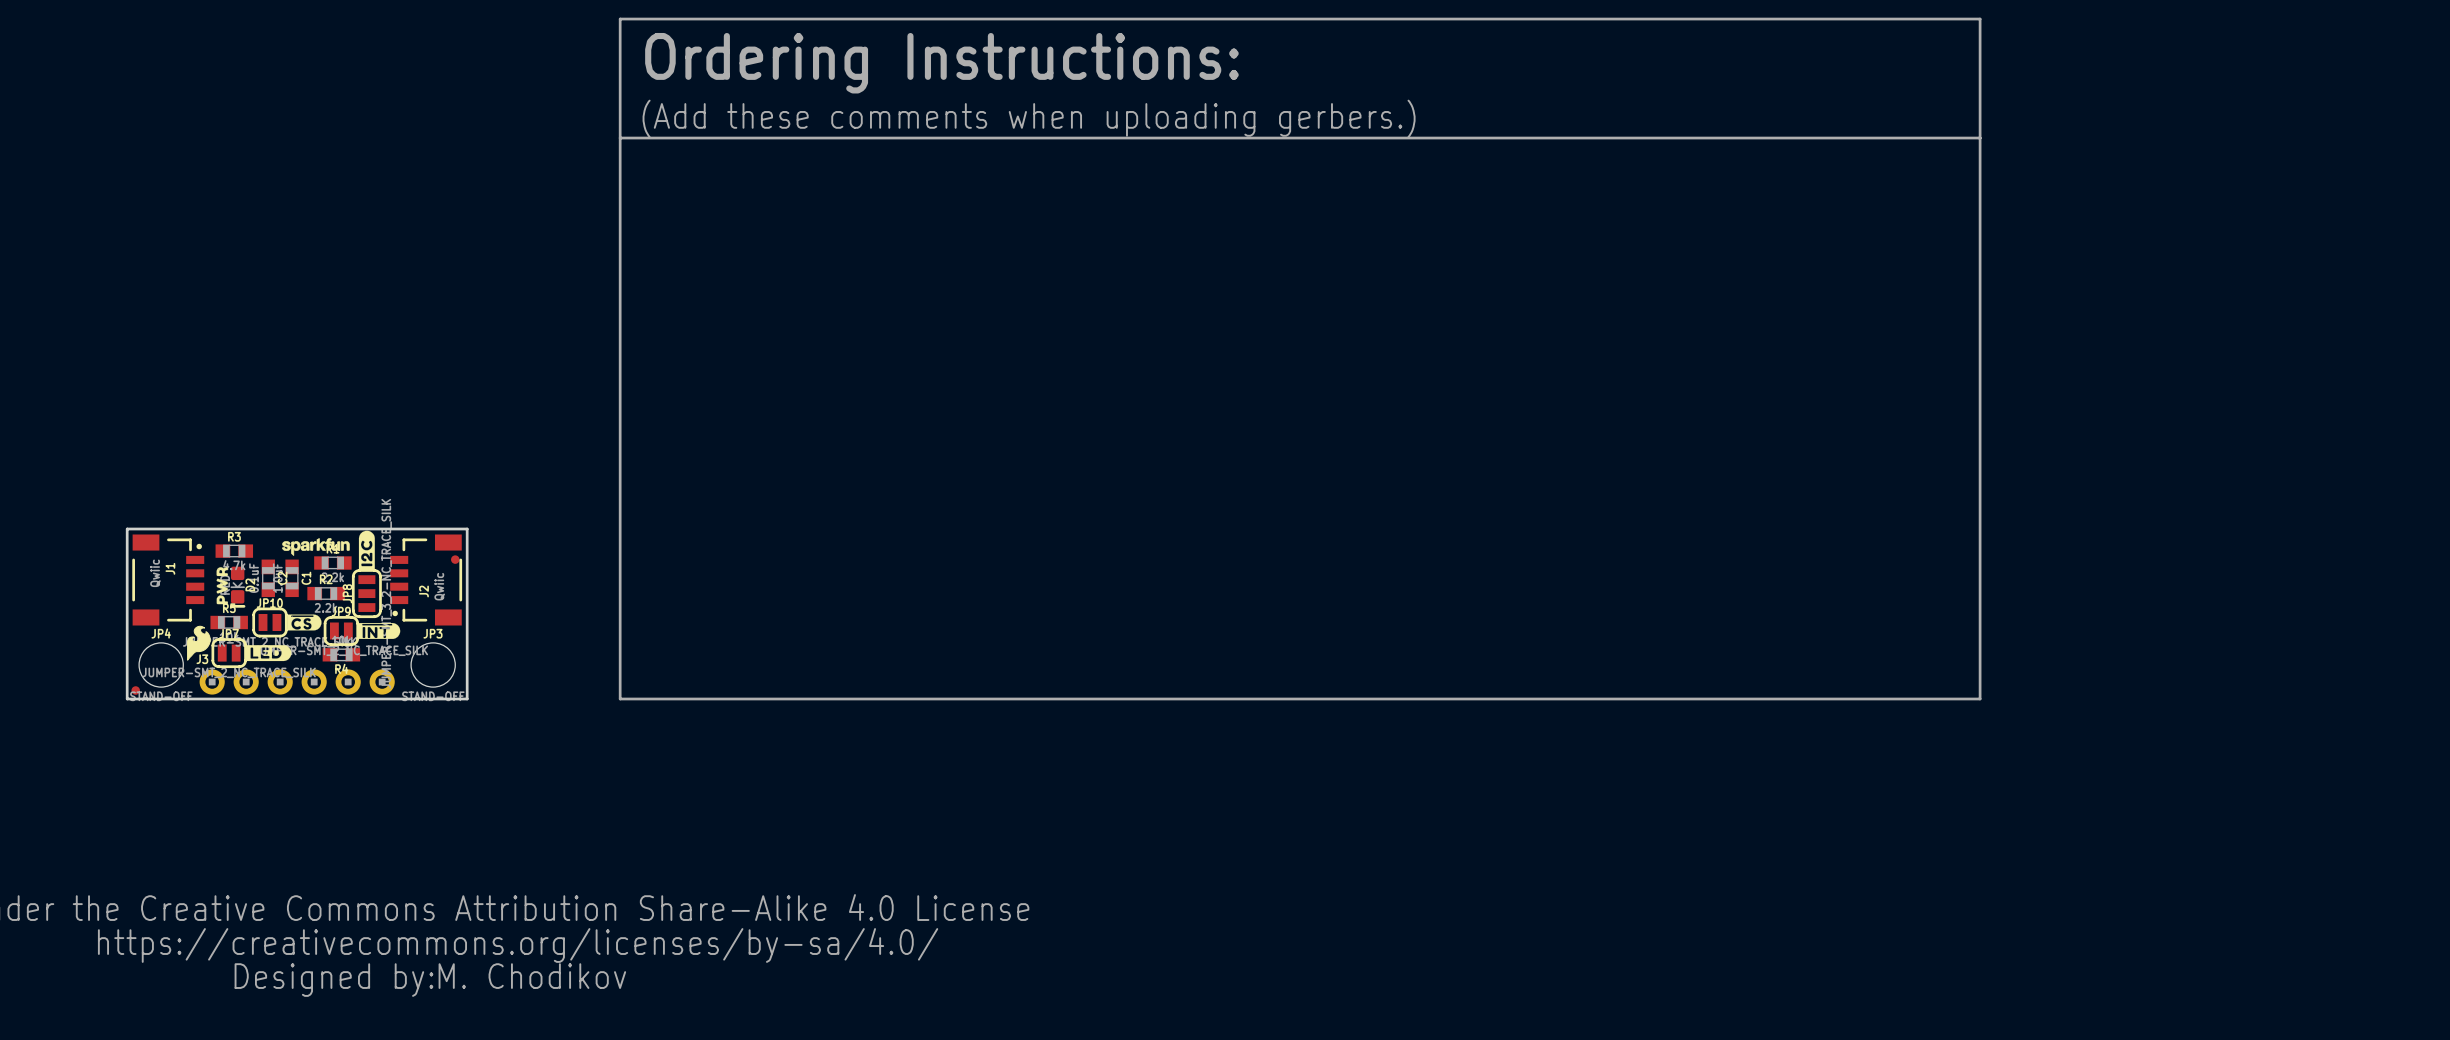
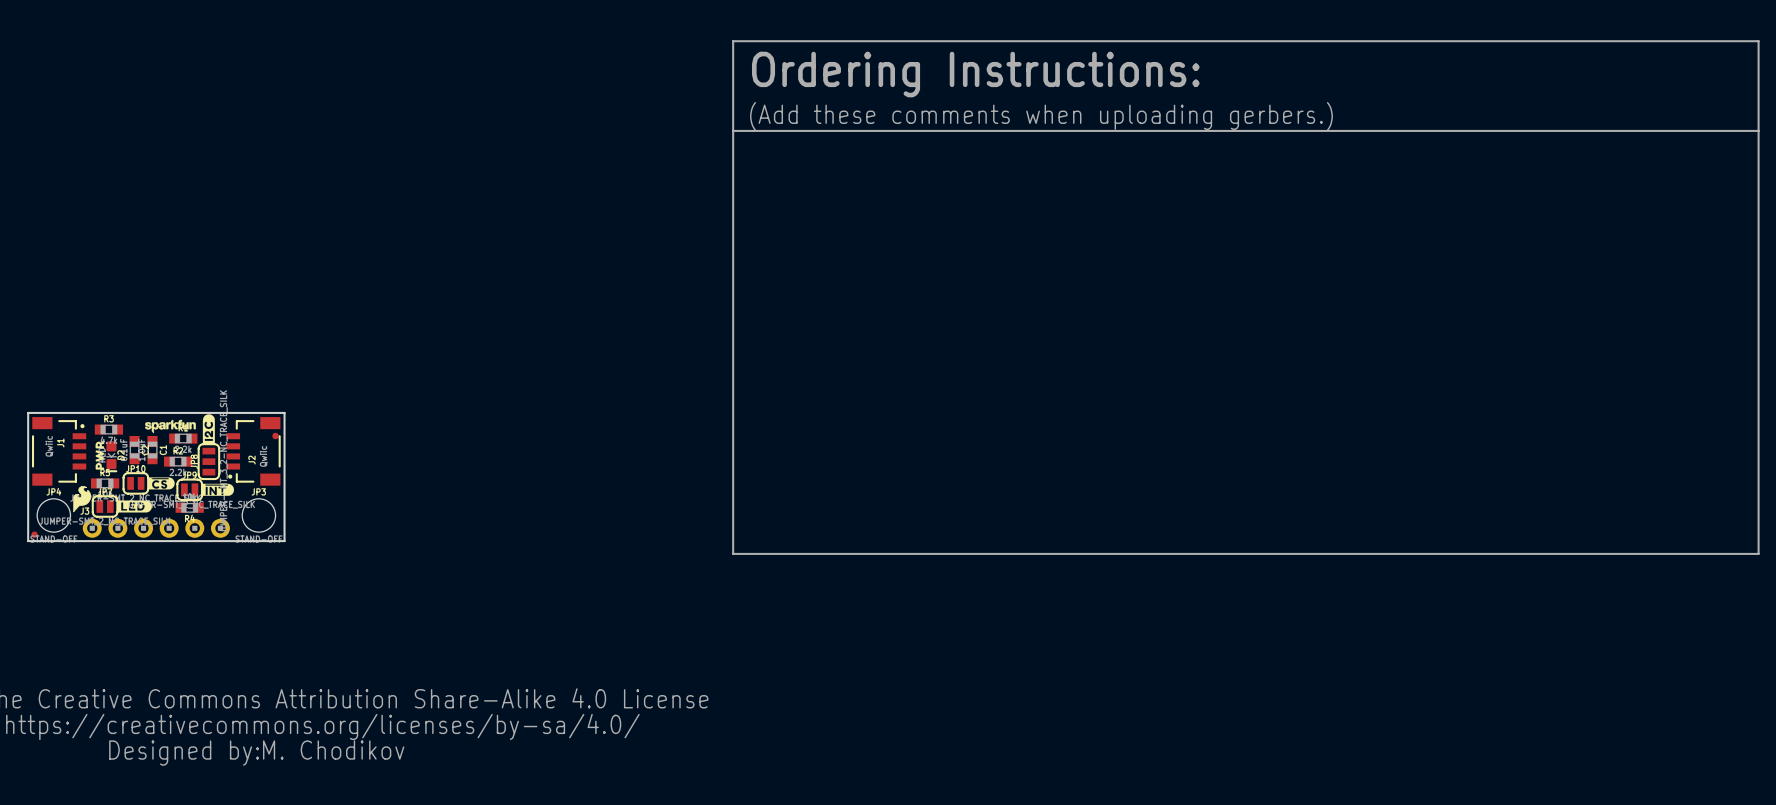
drawing: [618, 17, 1982, 701] -> none
drawing: none -> [732, 40, 1760, 555]

